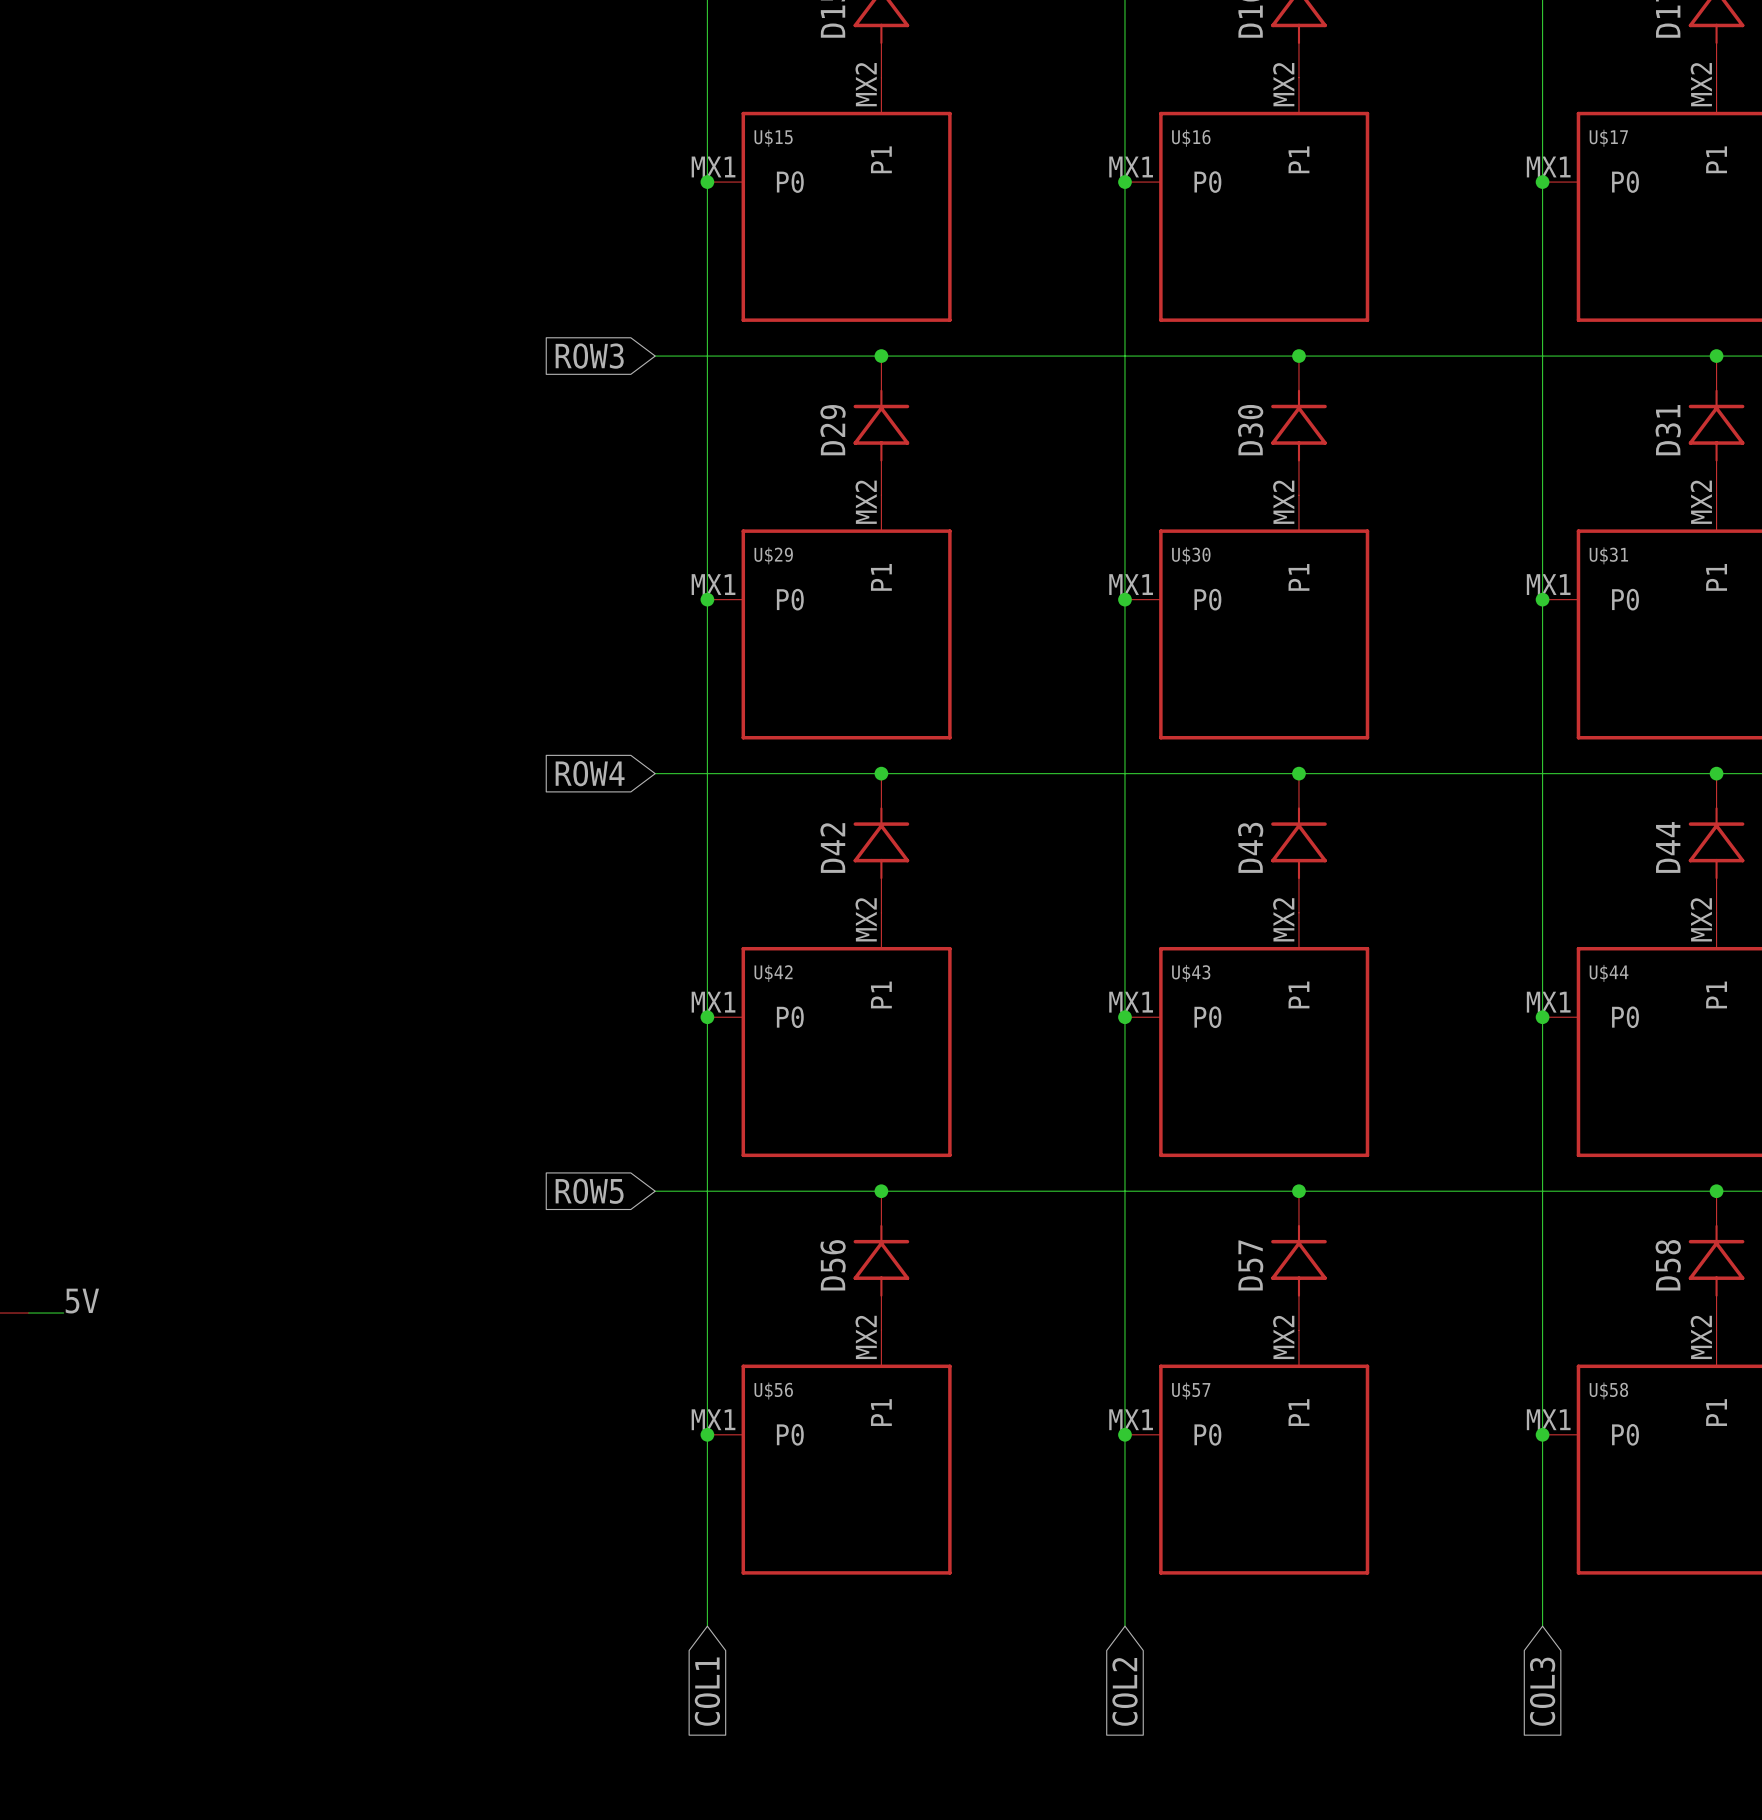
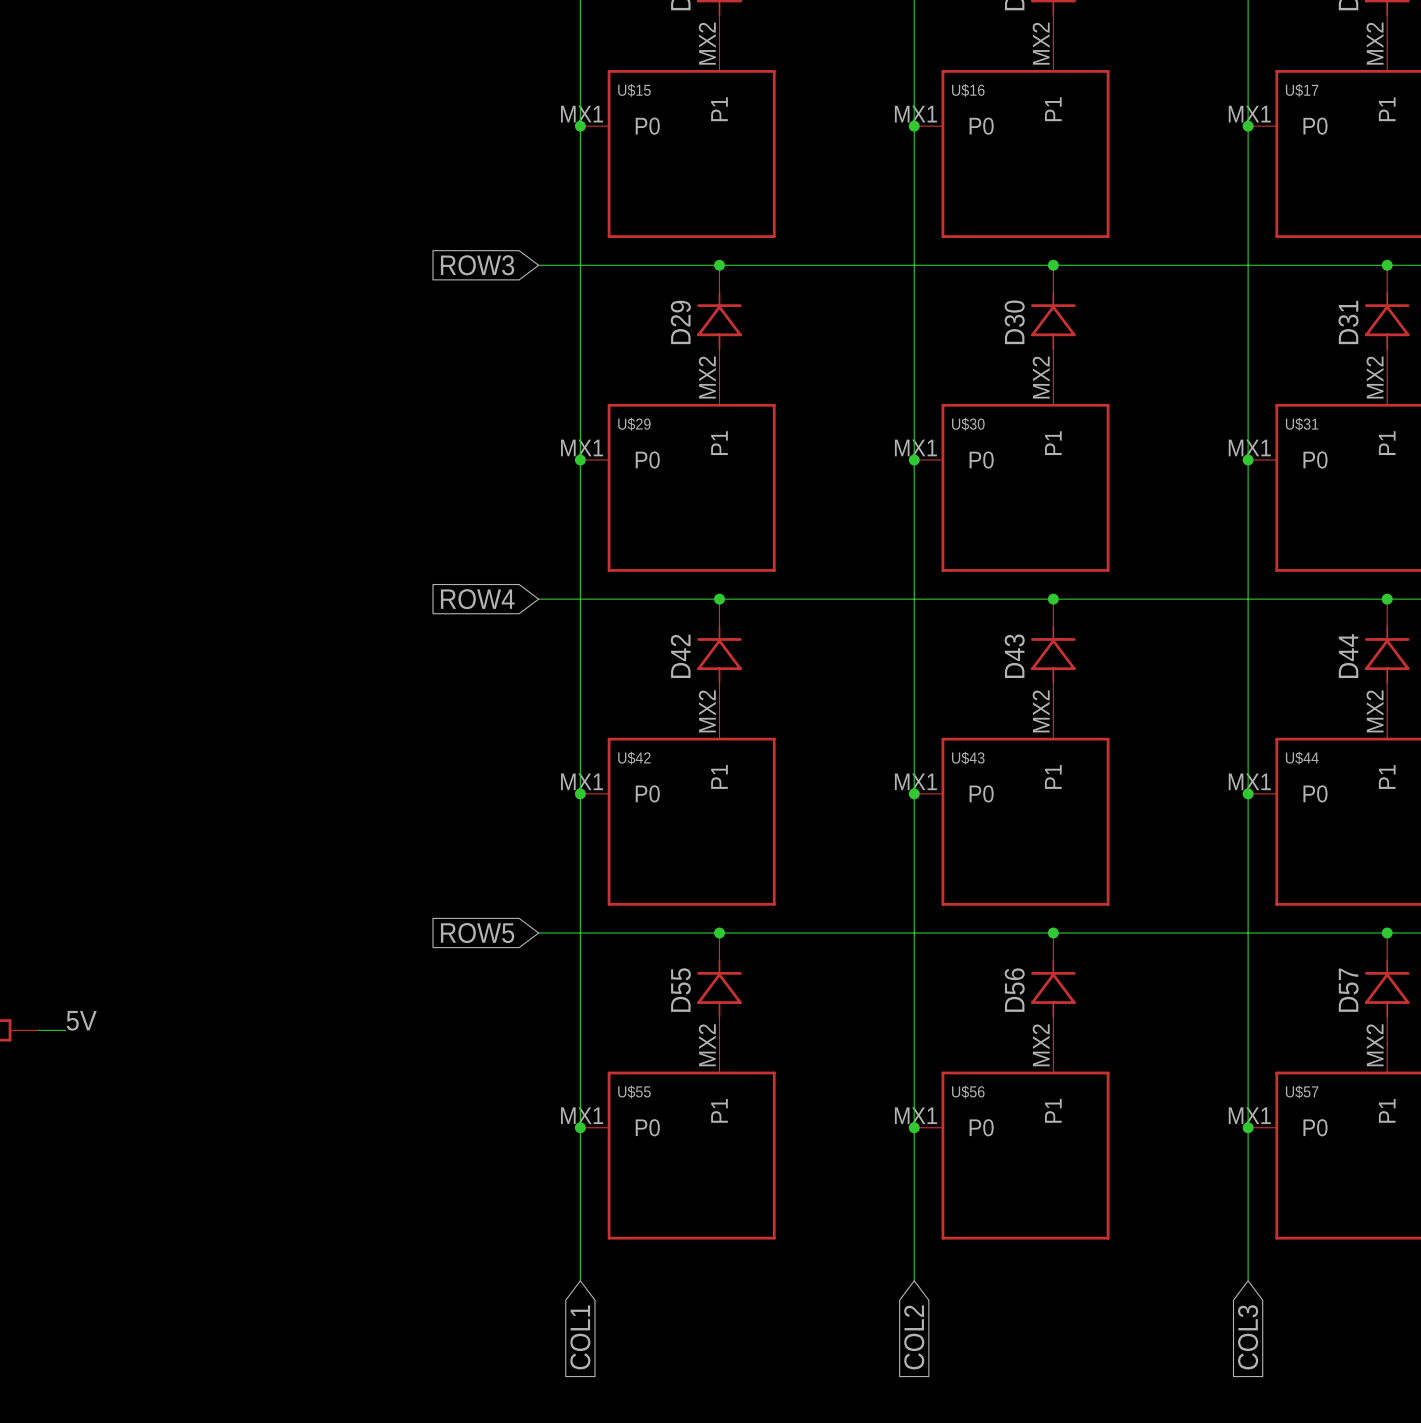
D56 name: D56 (833, 1265) -> D55 (680, 990)
D57 name: D57 (1250, 1265) -> D56 (1014, 990)
D58 name: D58 (1668, 1265) -> D57 (1348, 990)
U$56 name: U$56 (773, 1390) -> U$55 (634, 1091)
U$57 name: U$57 (1191, 1390) -> U$56 (968, 1091)
U$58 name: U$58 (1608, 1390) -> U$57 (1302, 1091)

